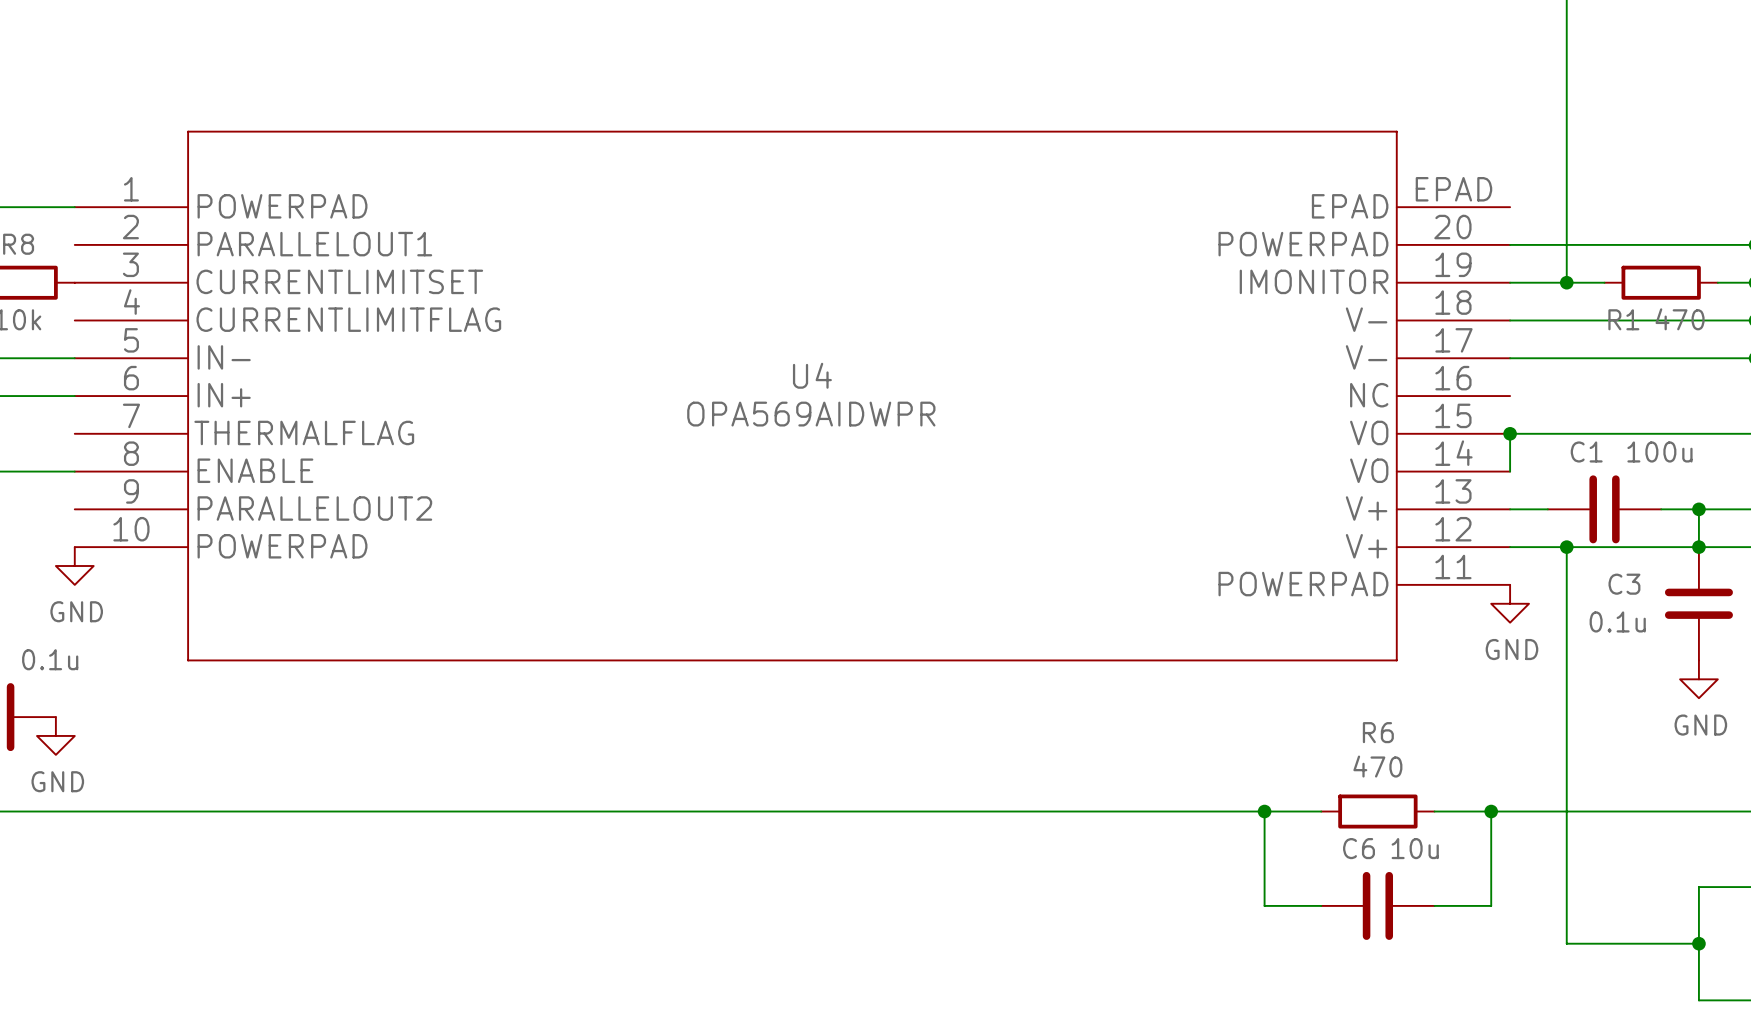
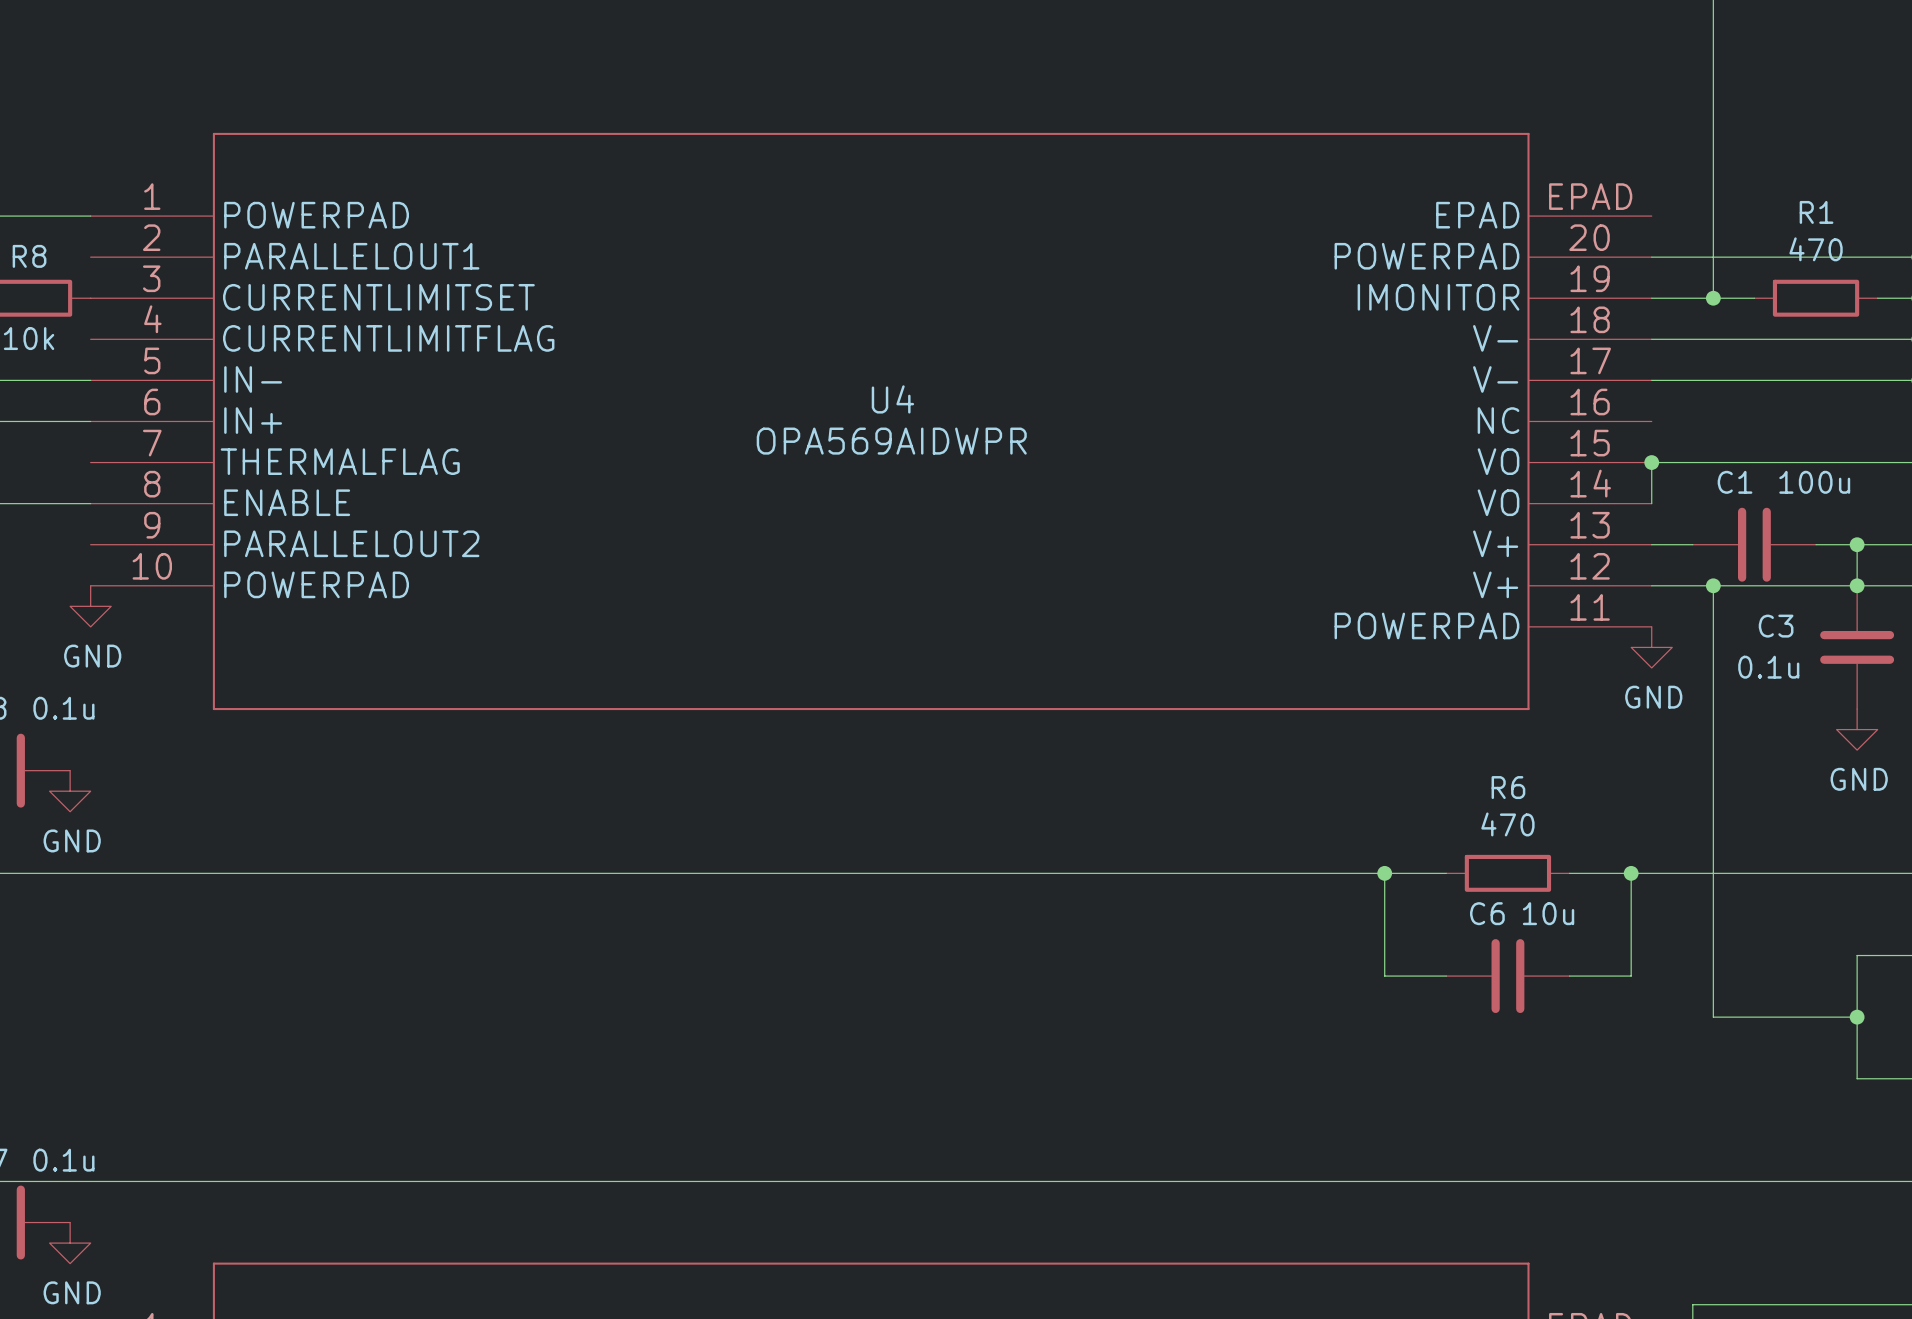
R1 name position: R1 (1623, 319) -> R1 (1816, 212)
R1 value position: 470 (1680, 319) -> 470 (1816, 249)

